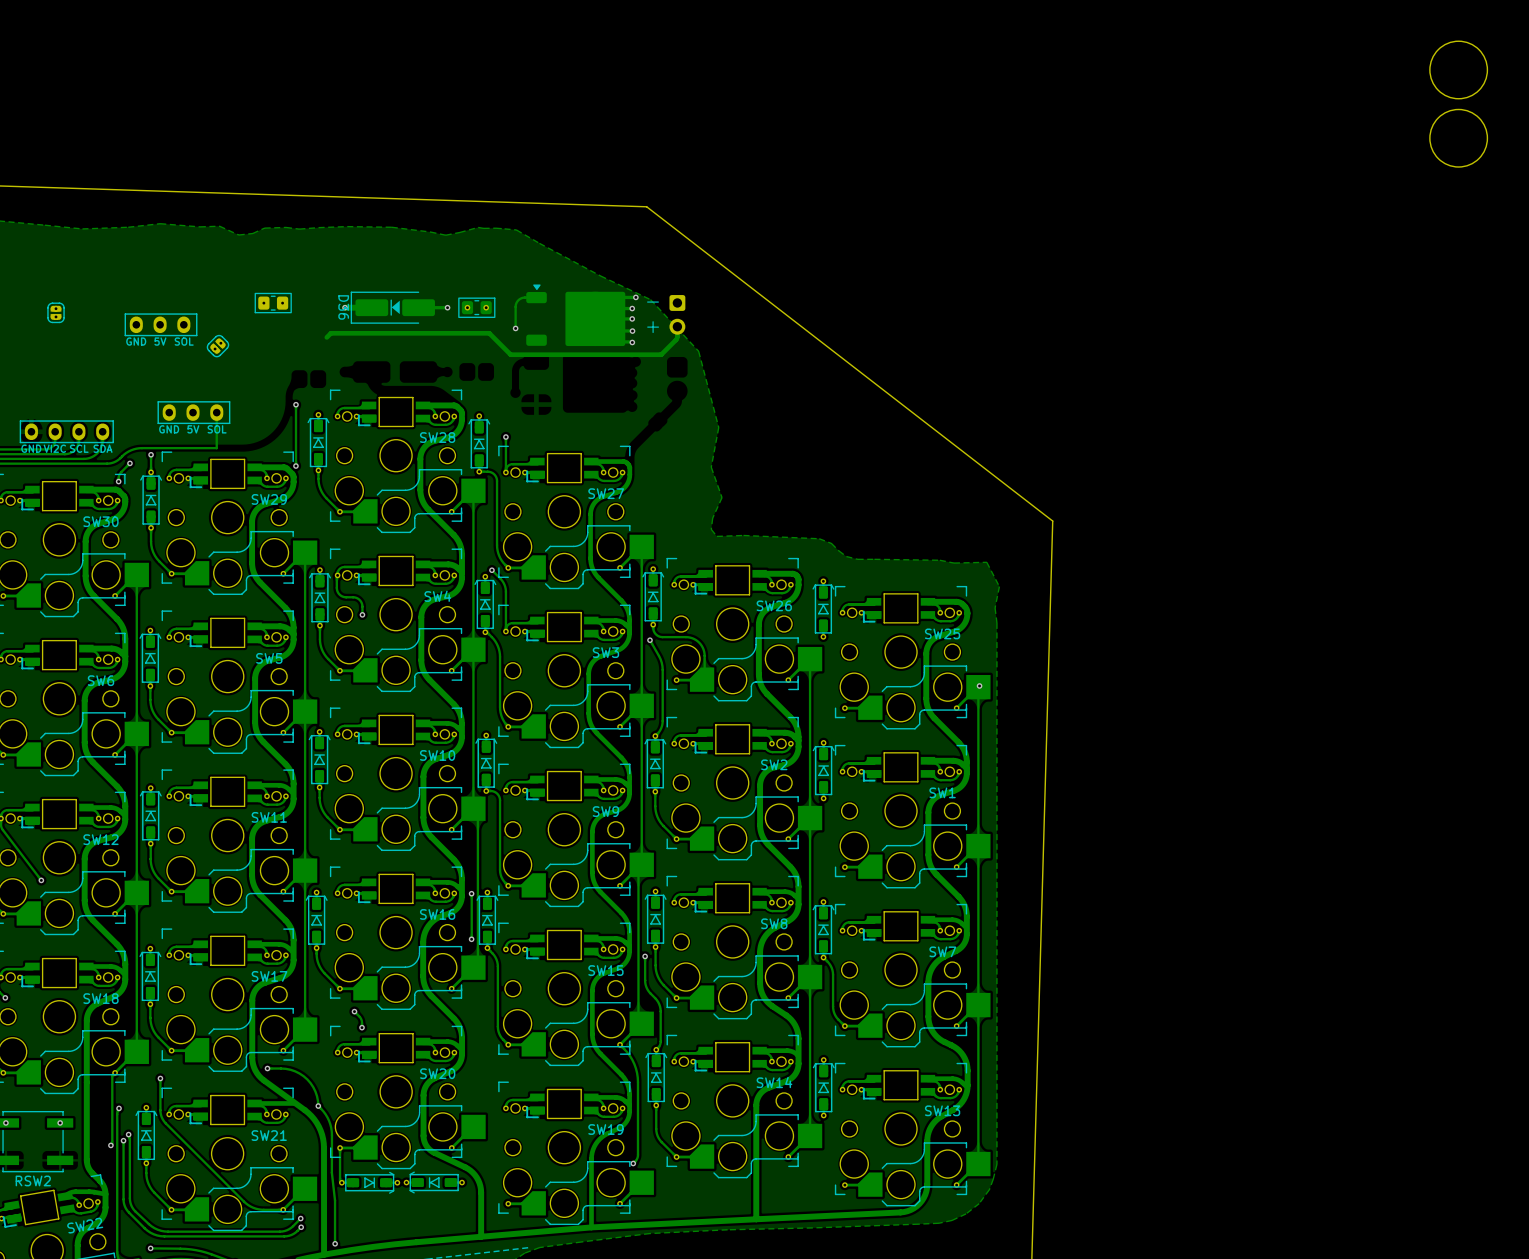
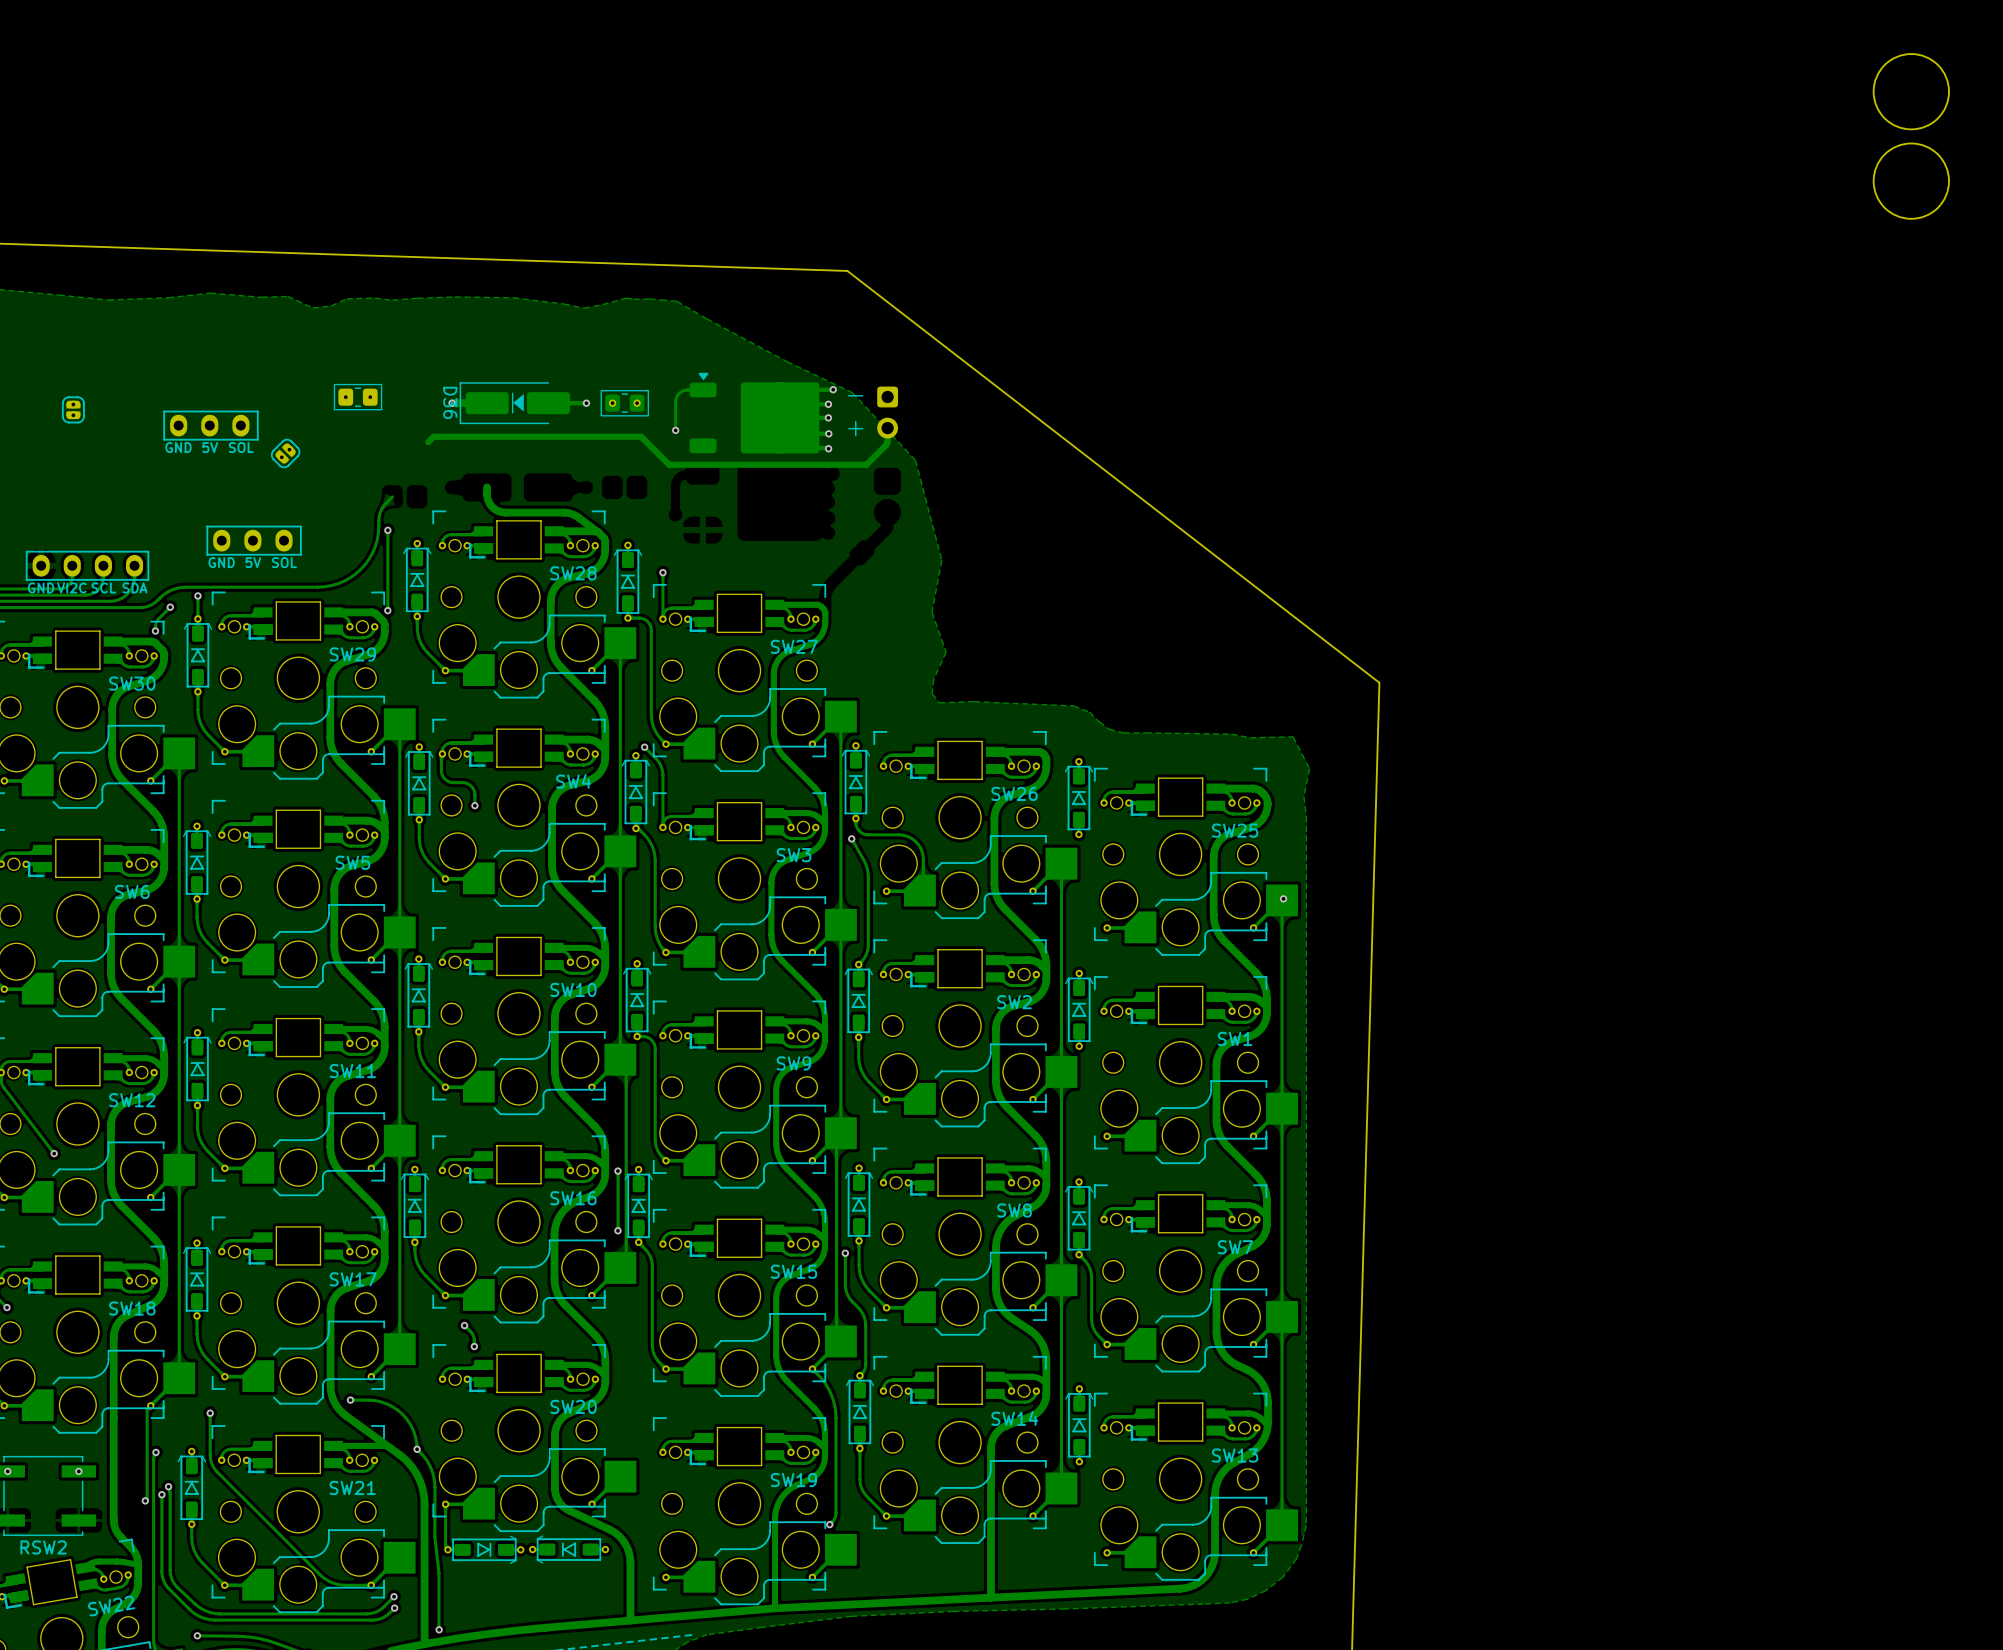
track: none -> (487, 487) (488, 501) (498, 511) (569, 513) (576, 516) (599, 533)
track: (216, 412) (216, 448) -> (392, 496) (379, 513) (377, 539) (372, 552) (365, 564) (355, 573) (344, 581) (331, 585) (284, 587)

